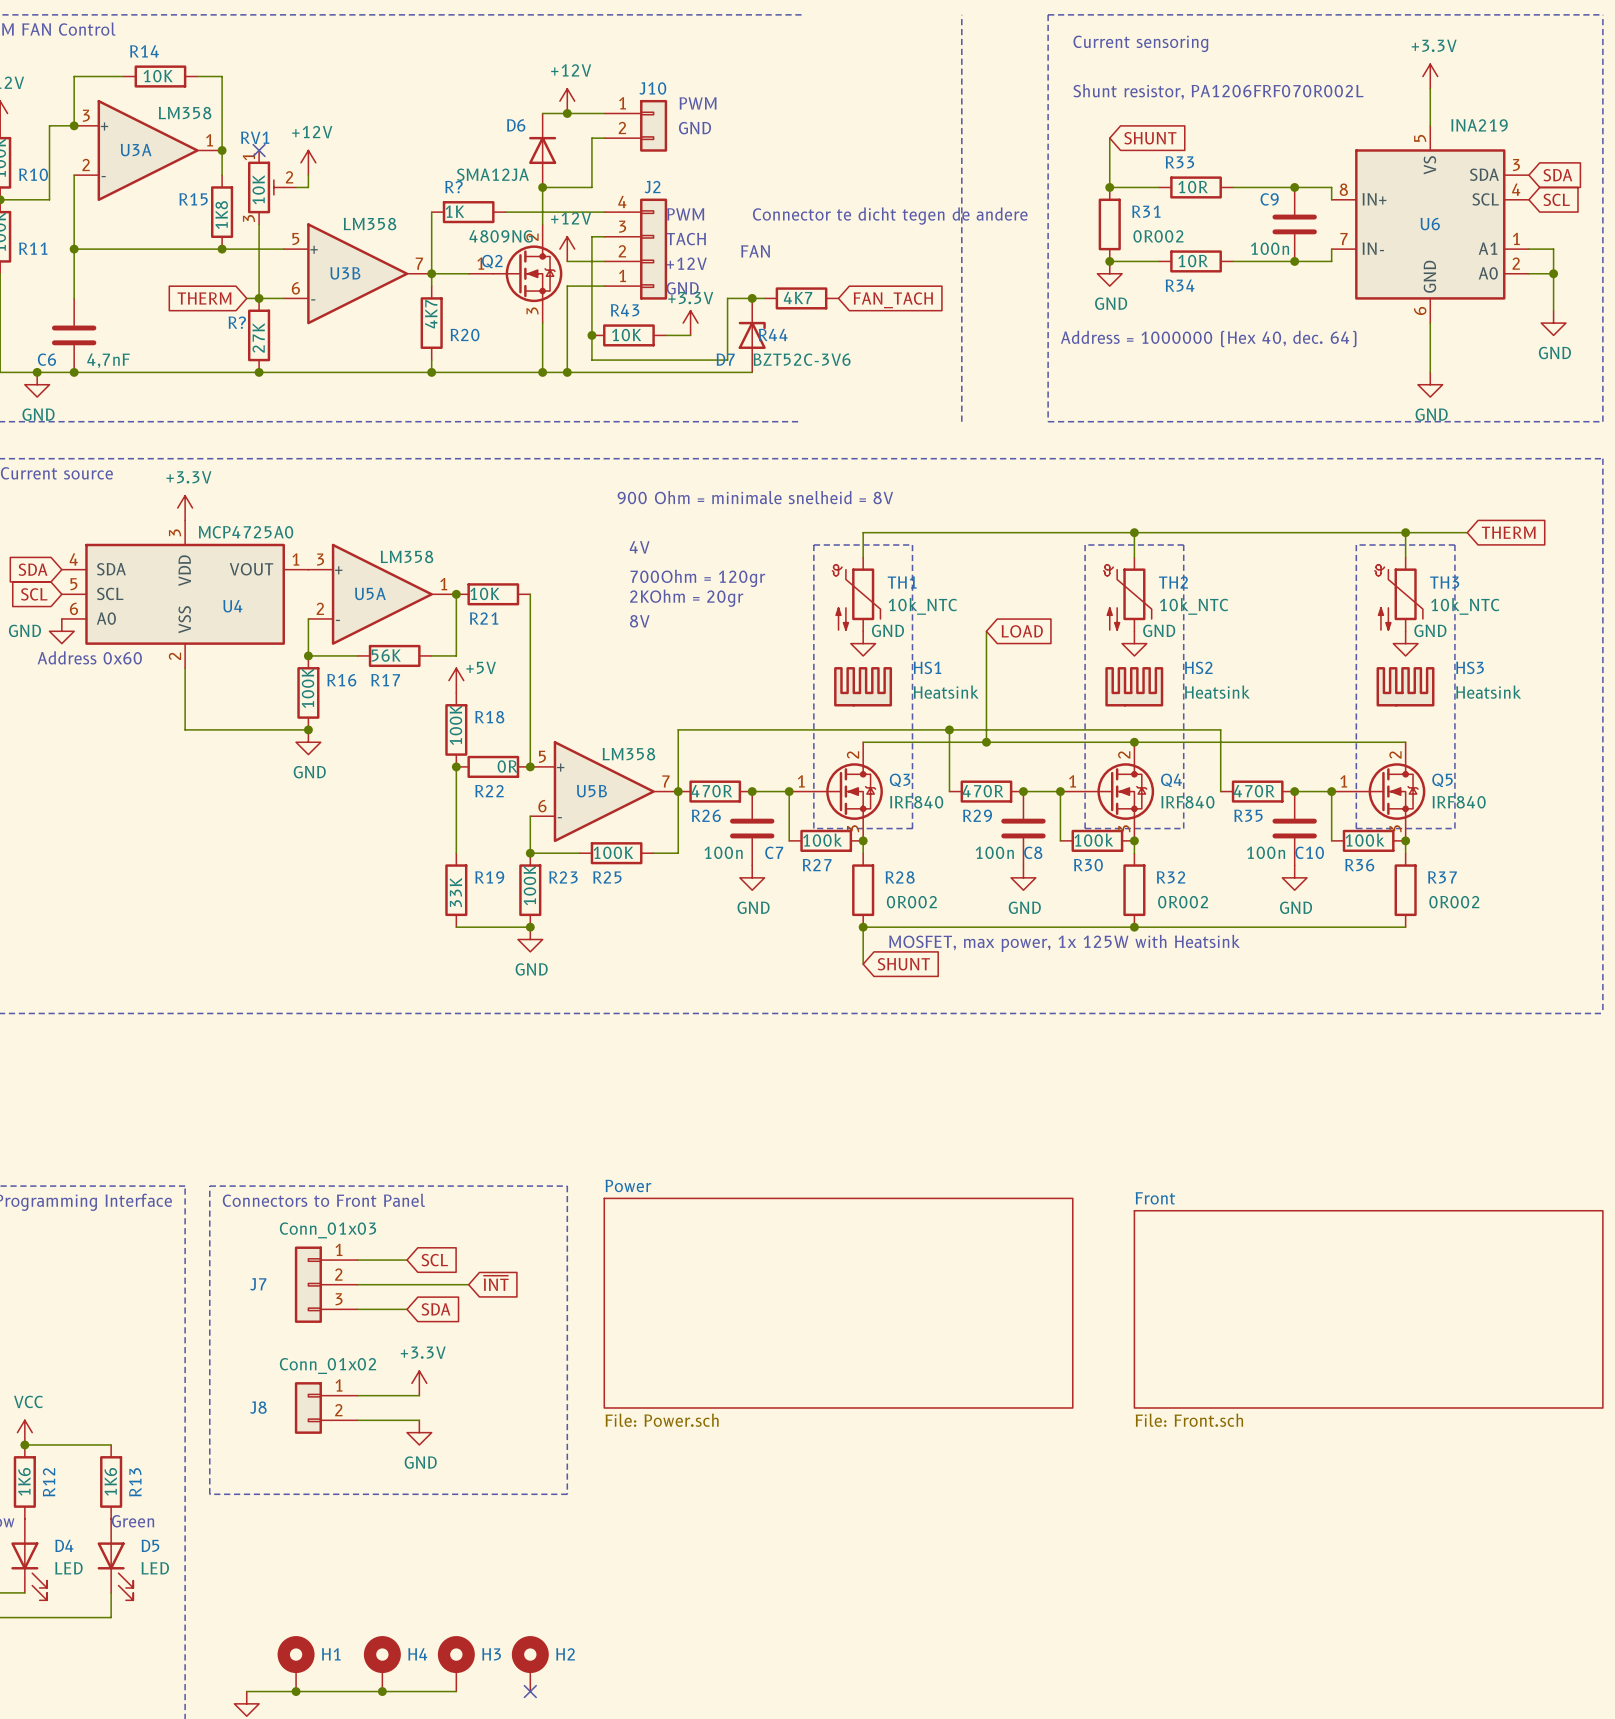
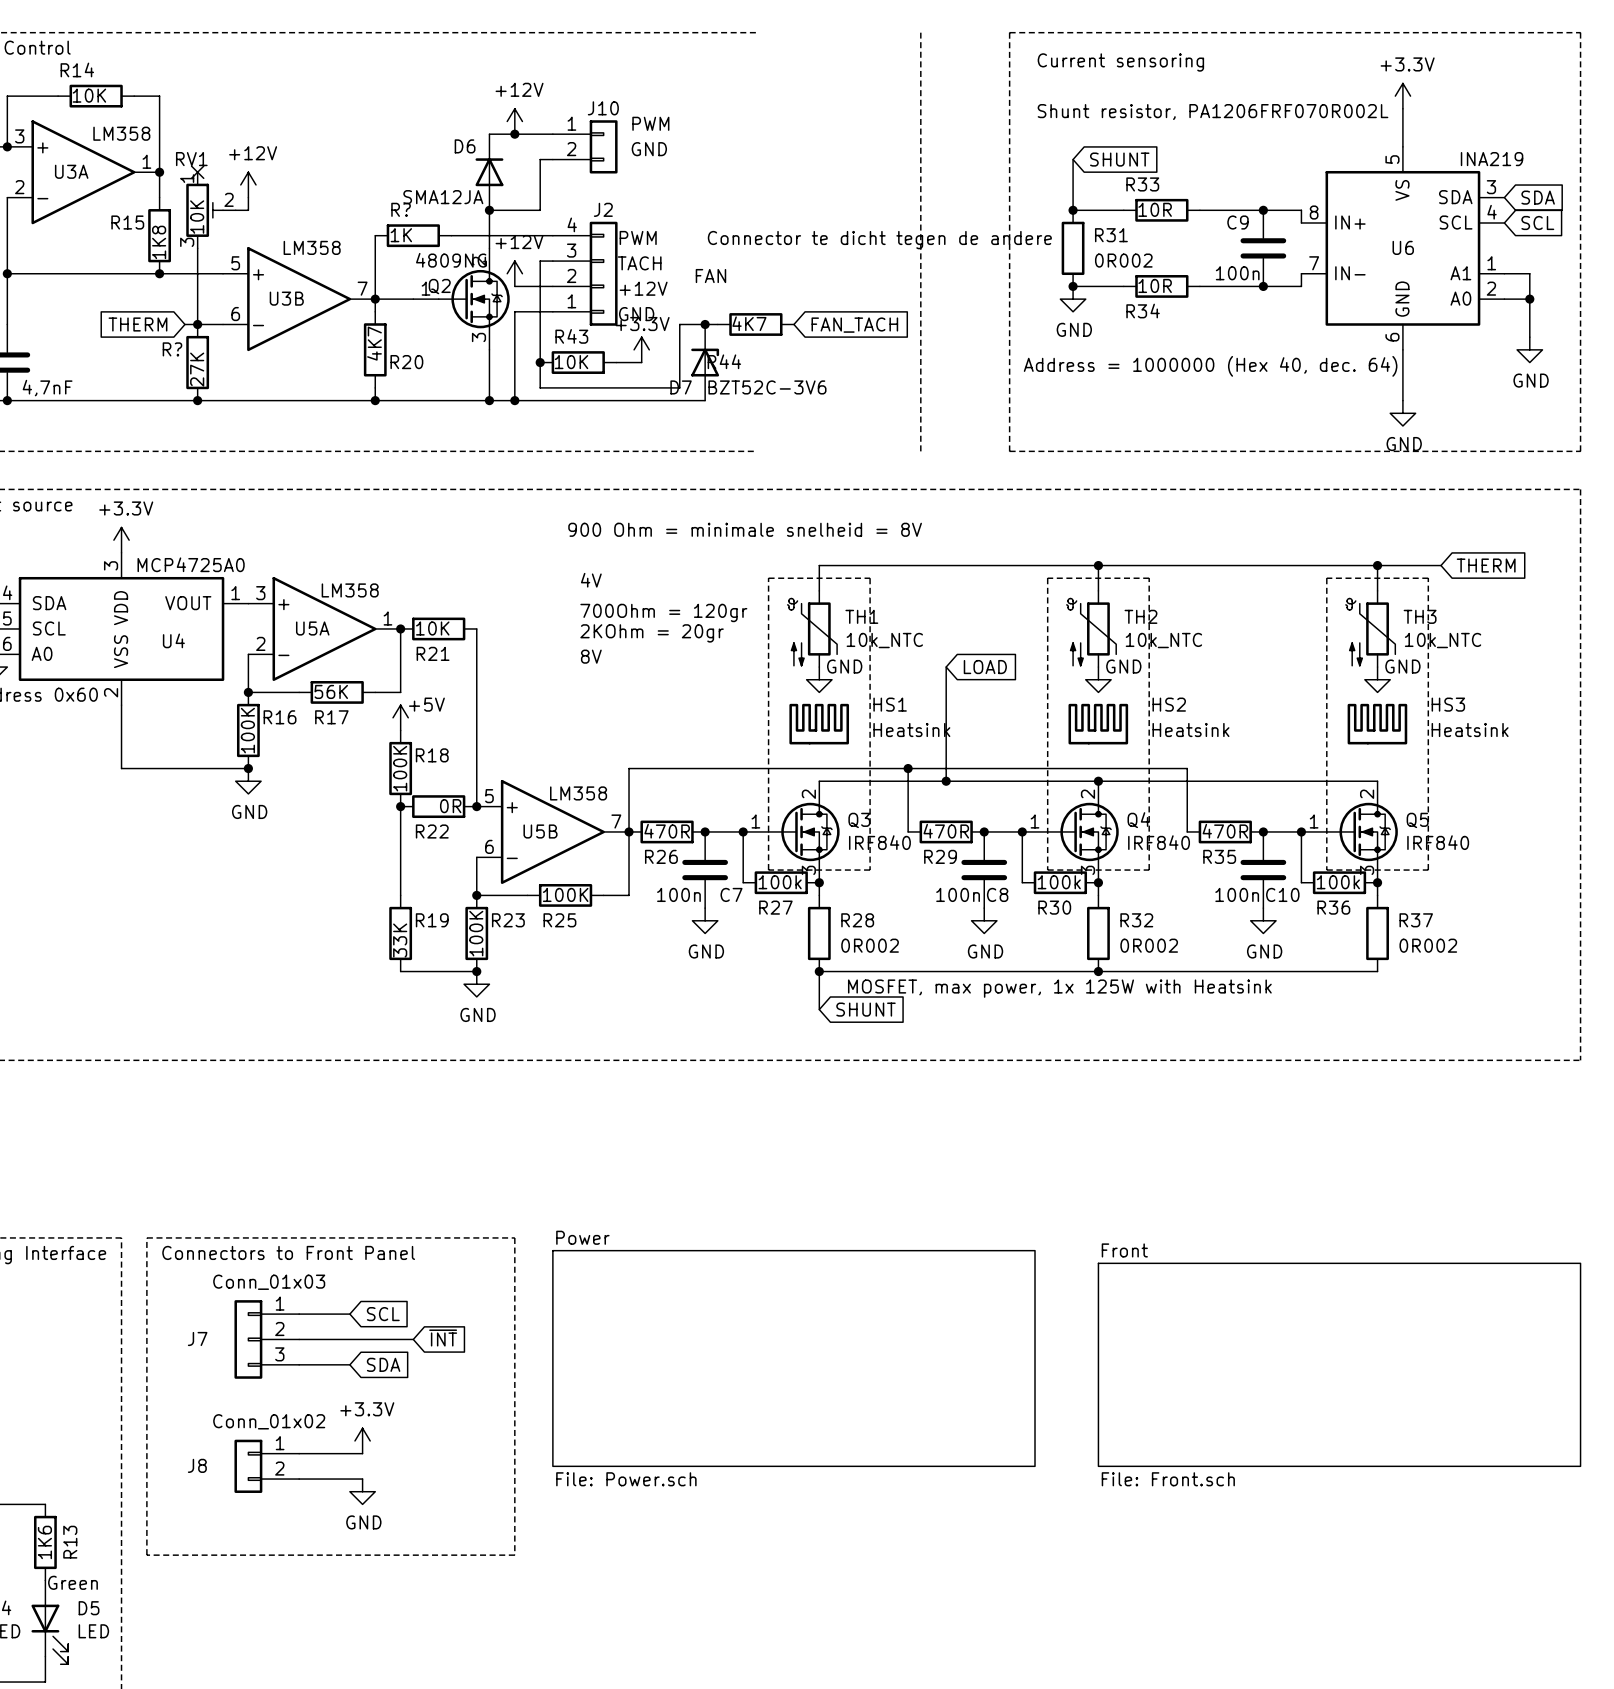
U6 value position: INA219 (1479, 125) -> INA219 (1492, 159)

